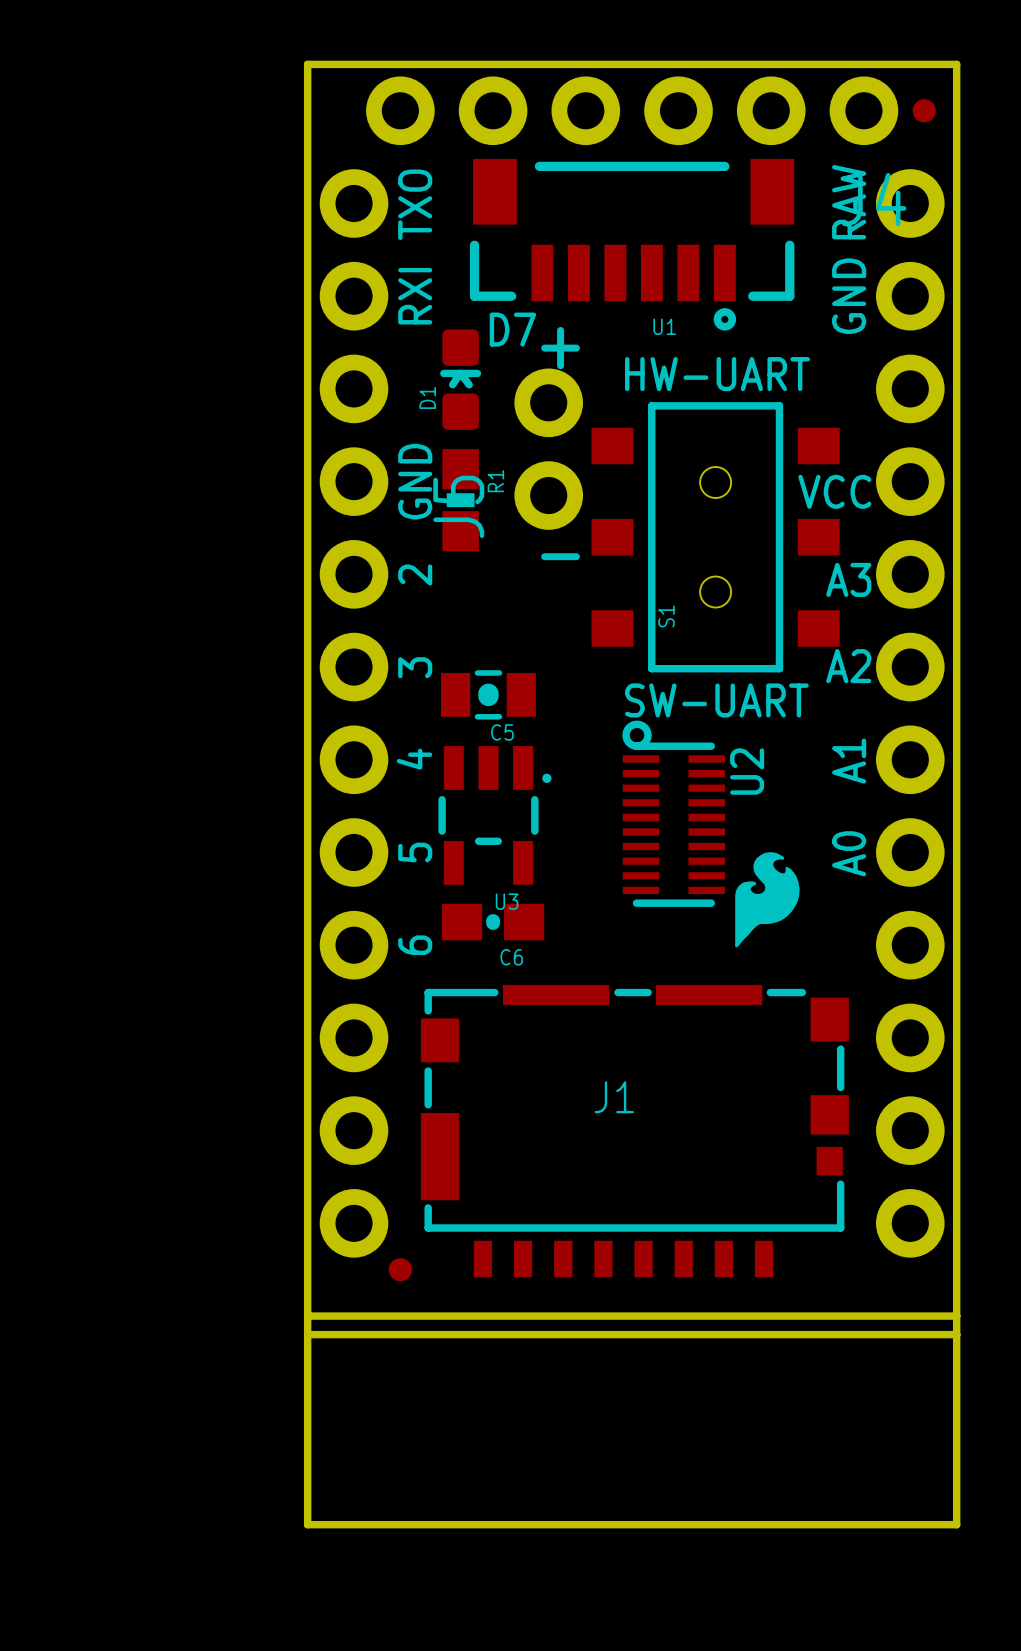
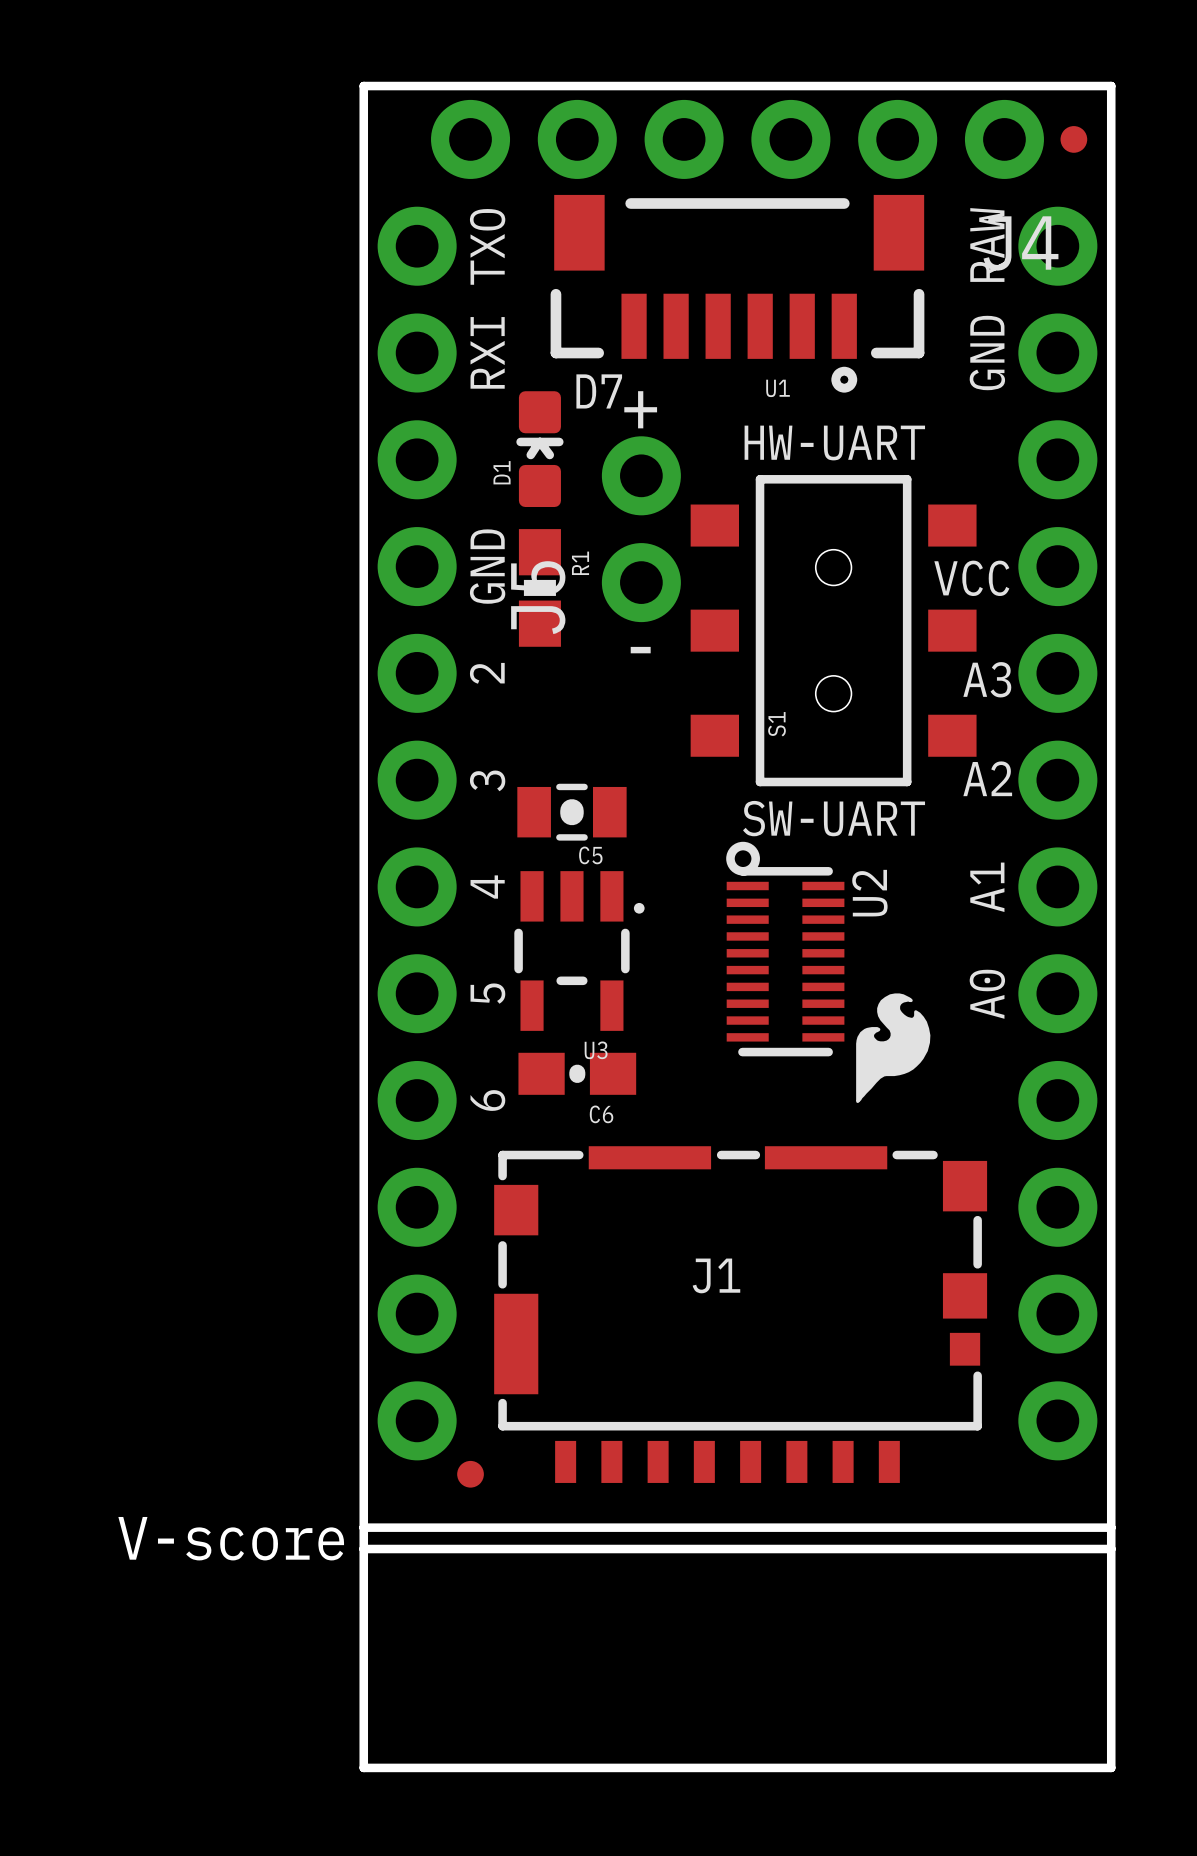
text: none -> V-score (231, 1538)

